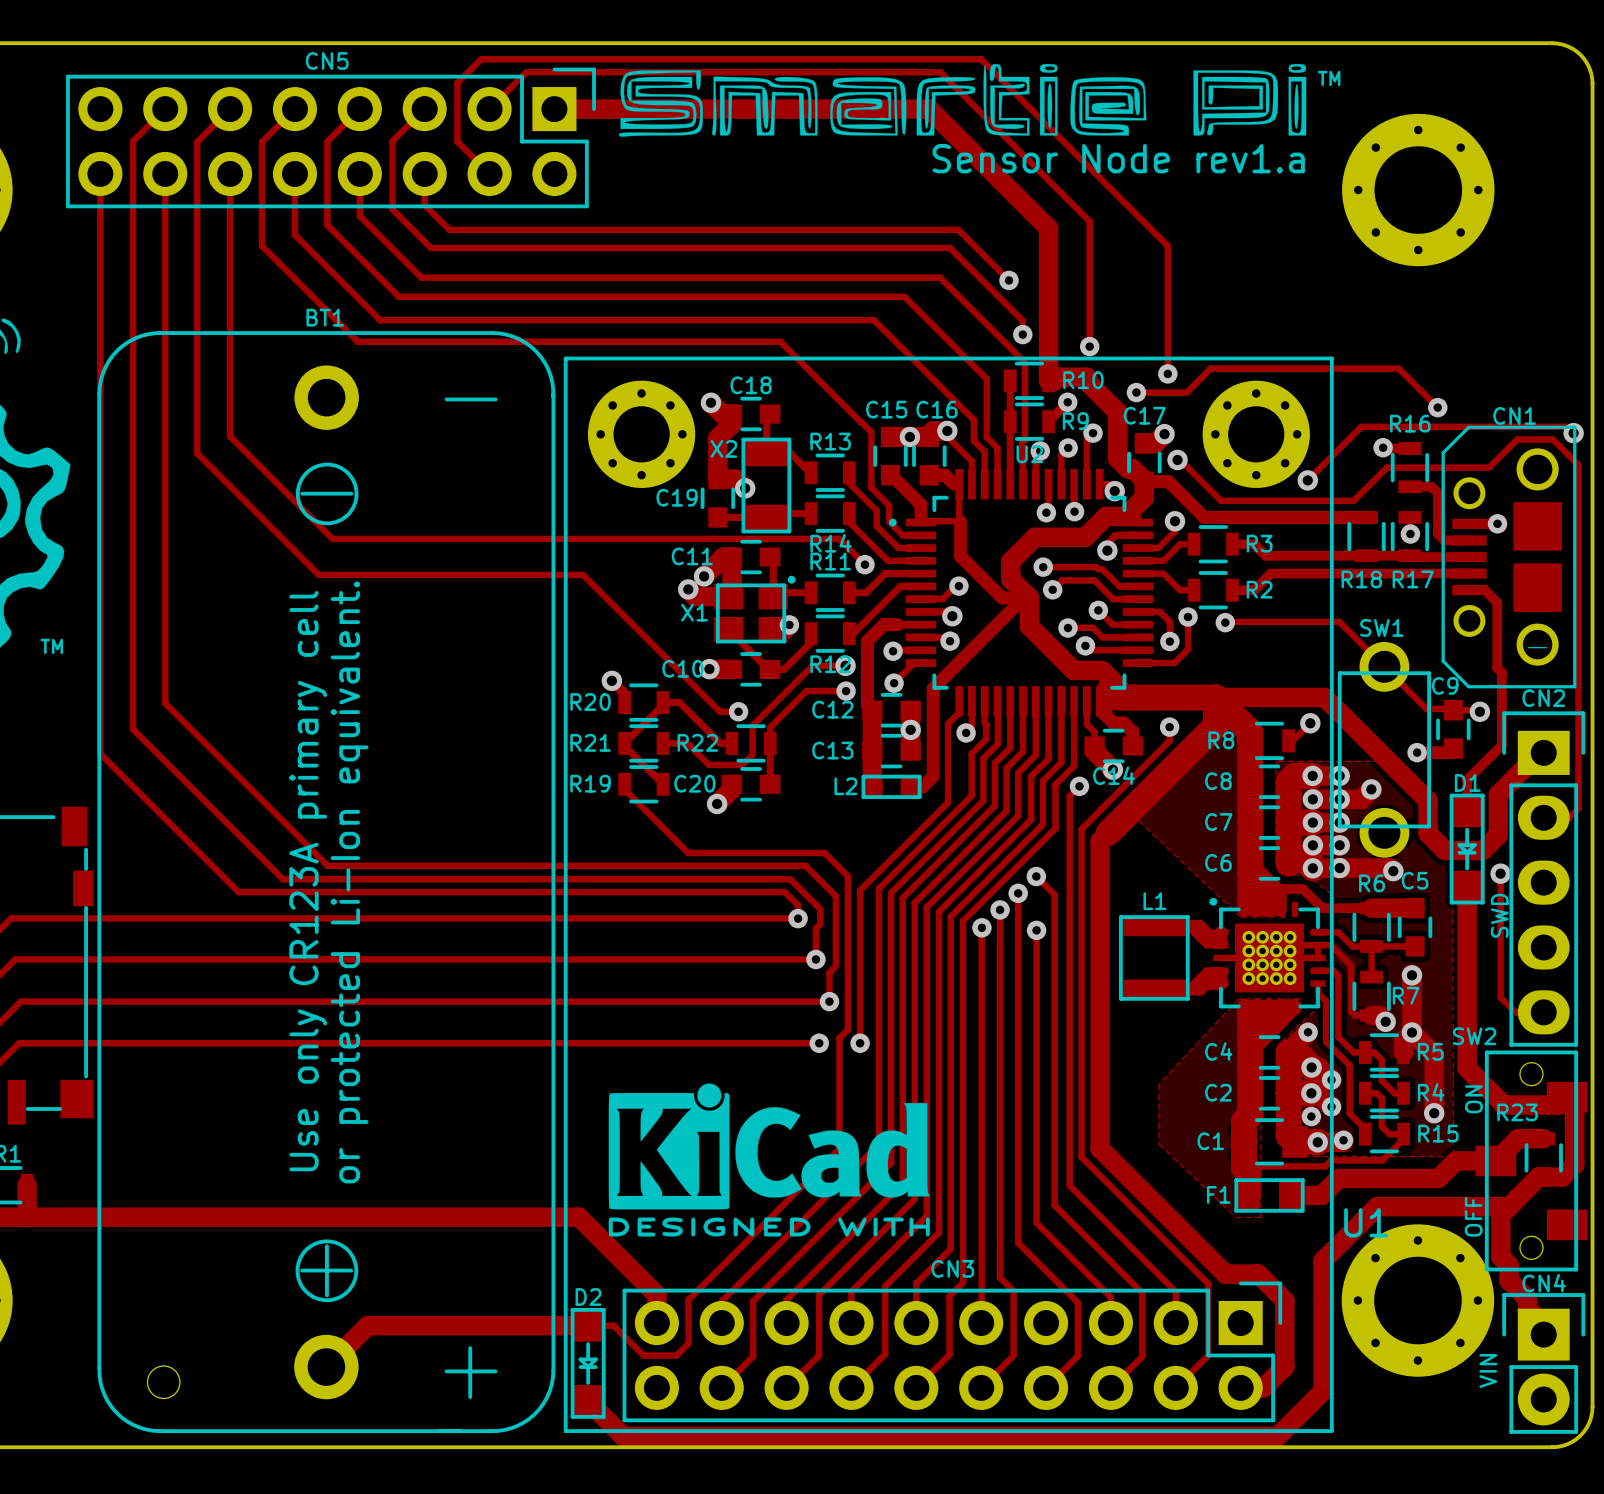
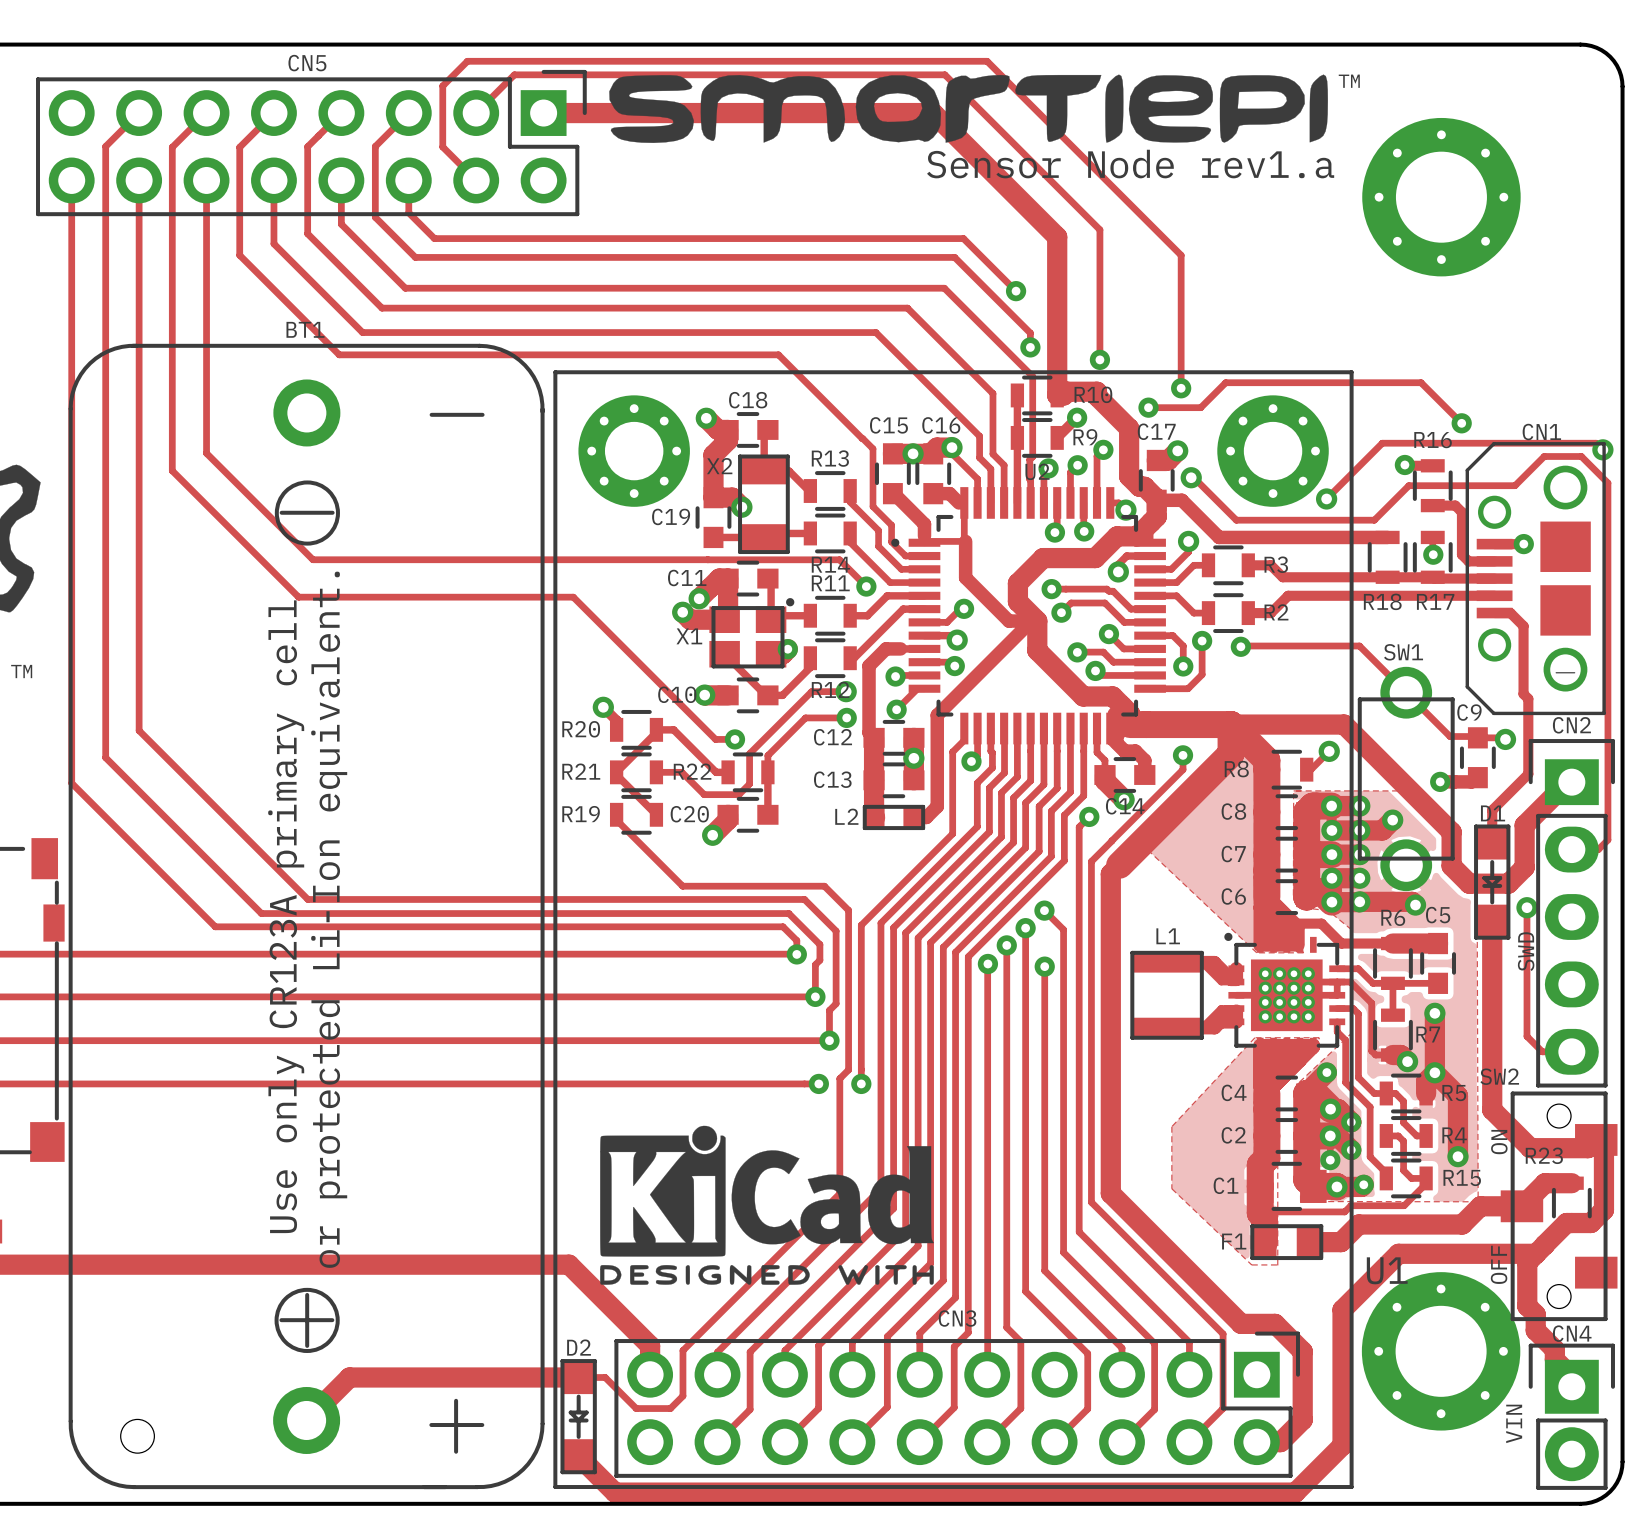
drawing shape: [618, 63, 1307, 137] -> [609, 74, 1328, 143]

